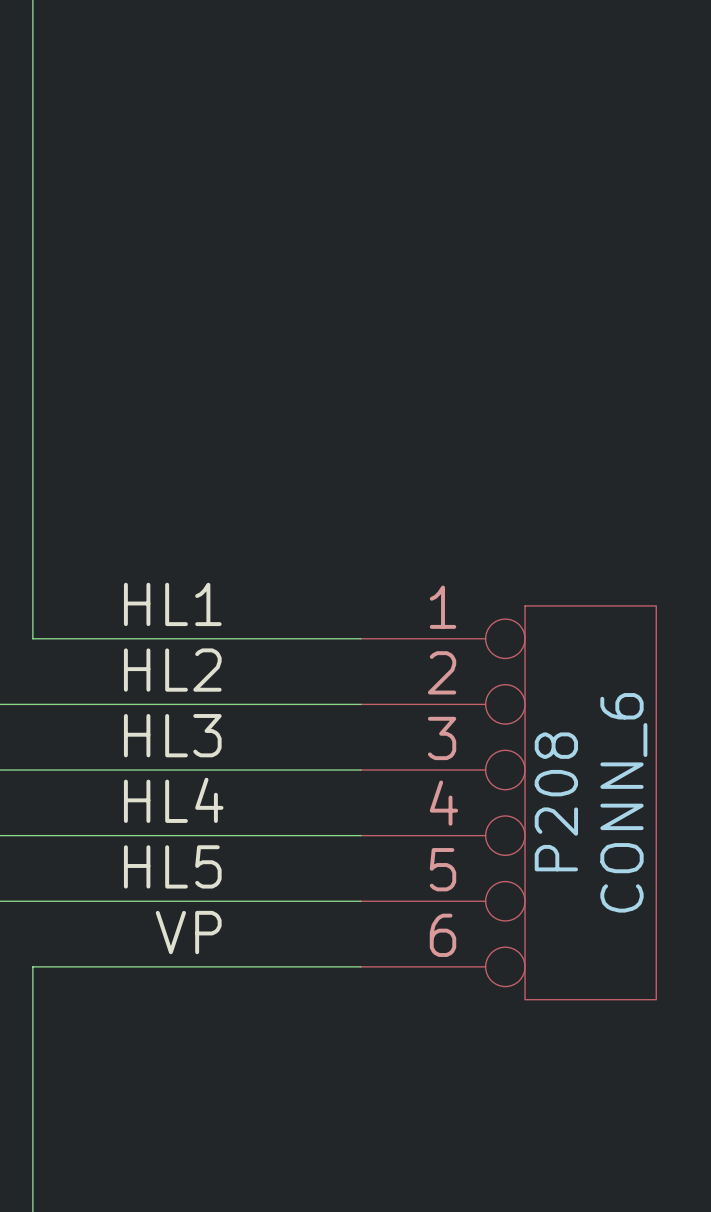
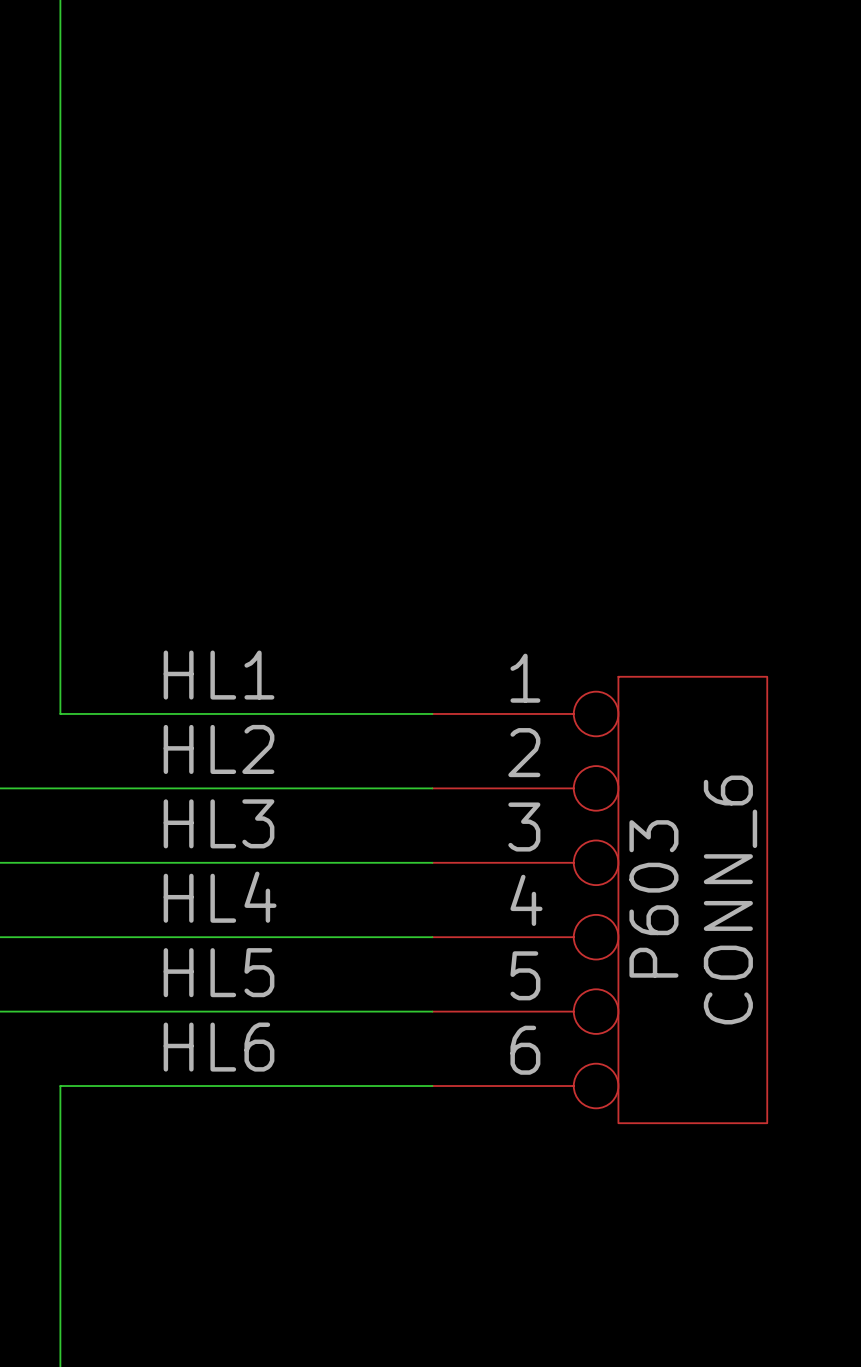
P208 name: P208 (556, 801) -> P603 (653, 898)
label: VP (188, 932) -> HL6 (219, 1047)

